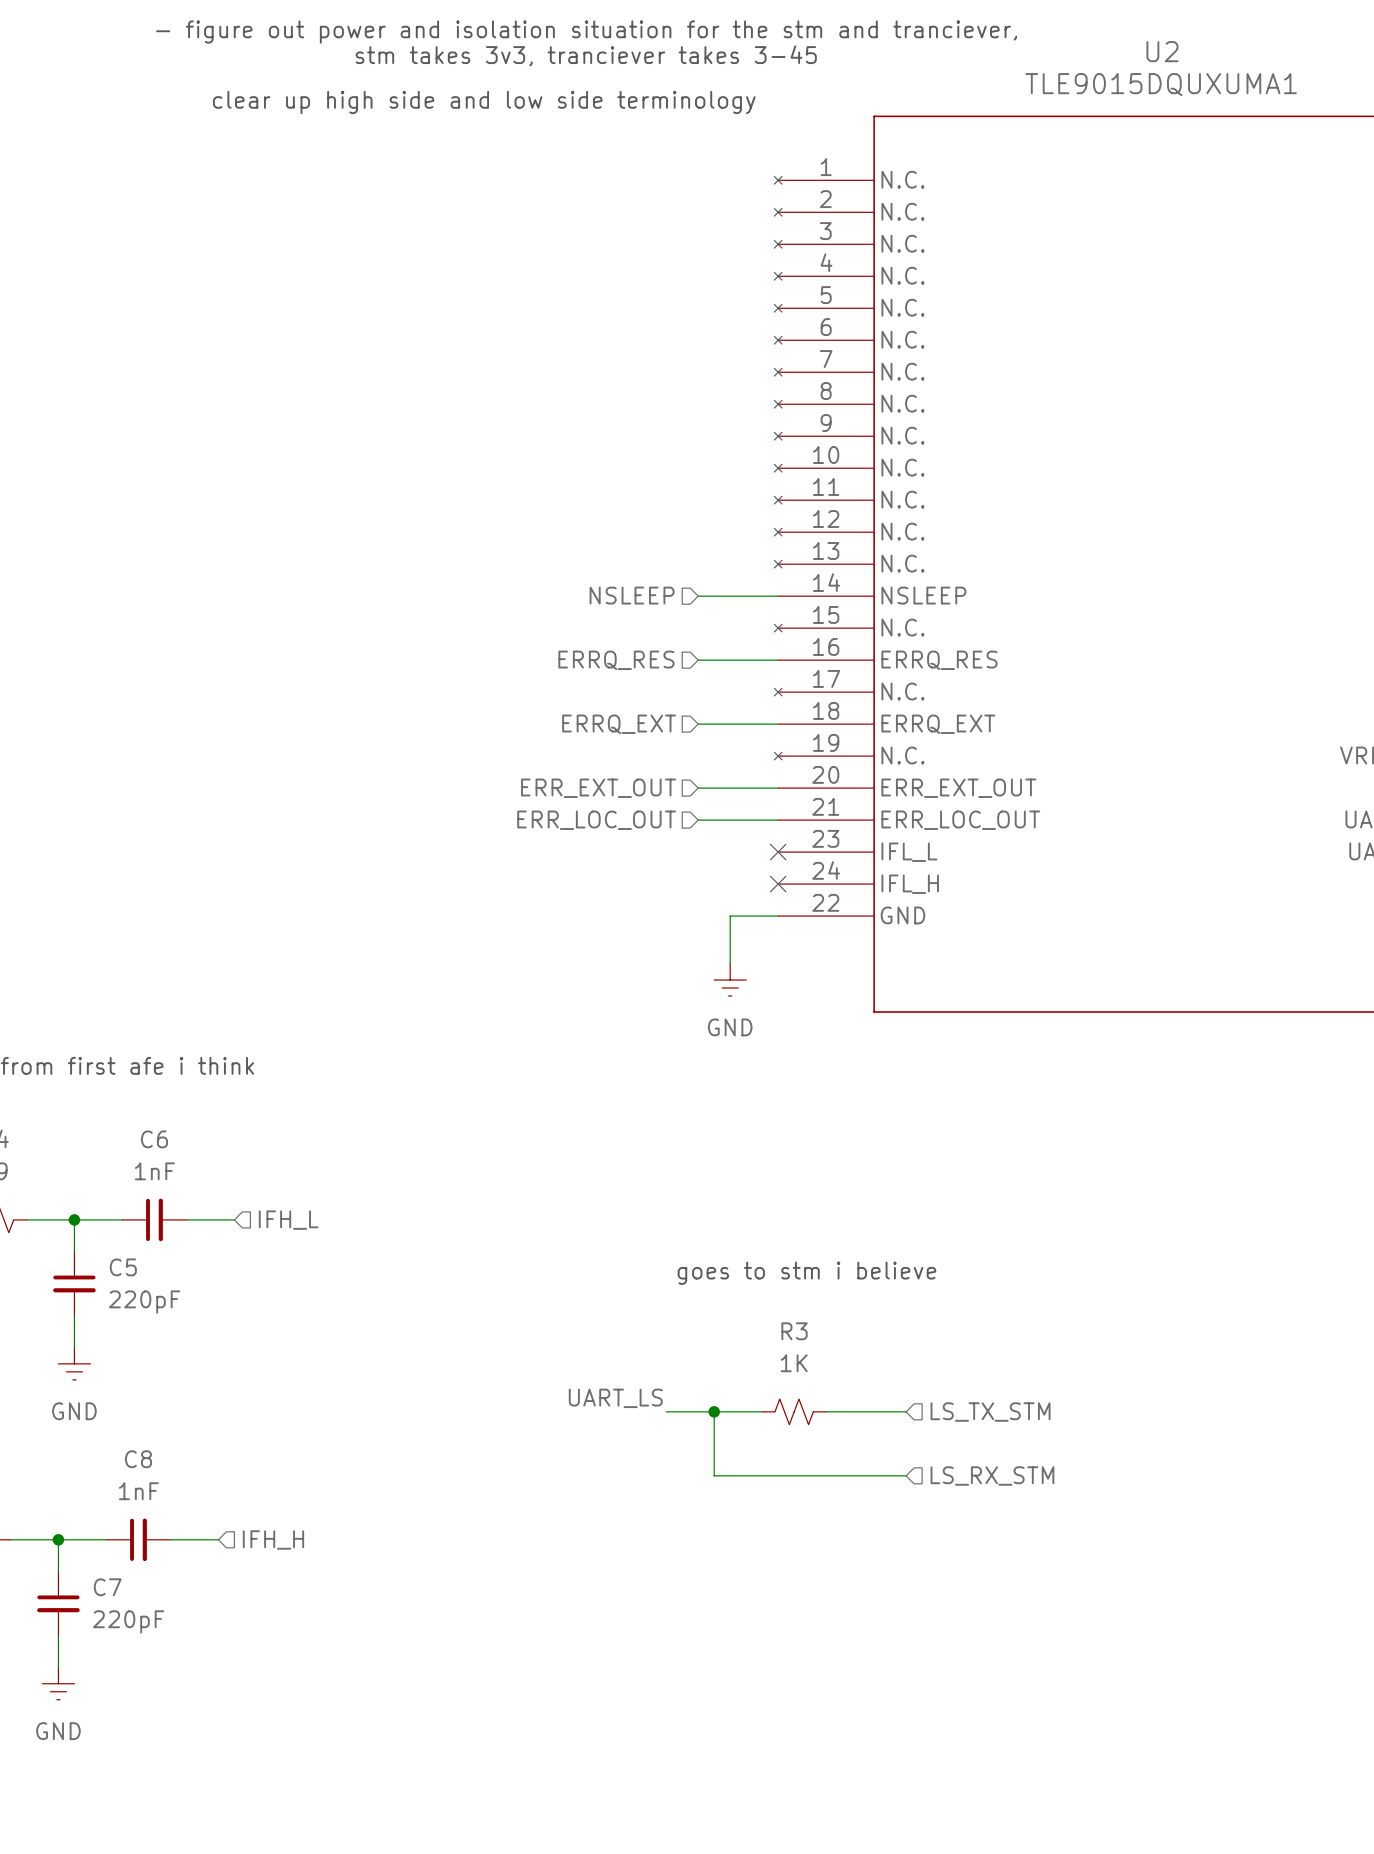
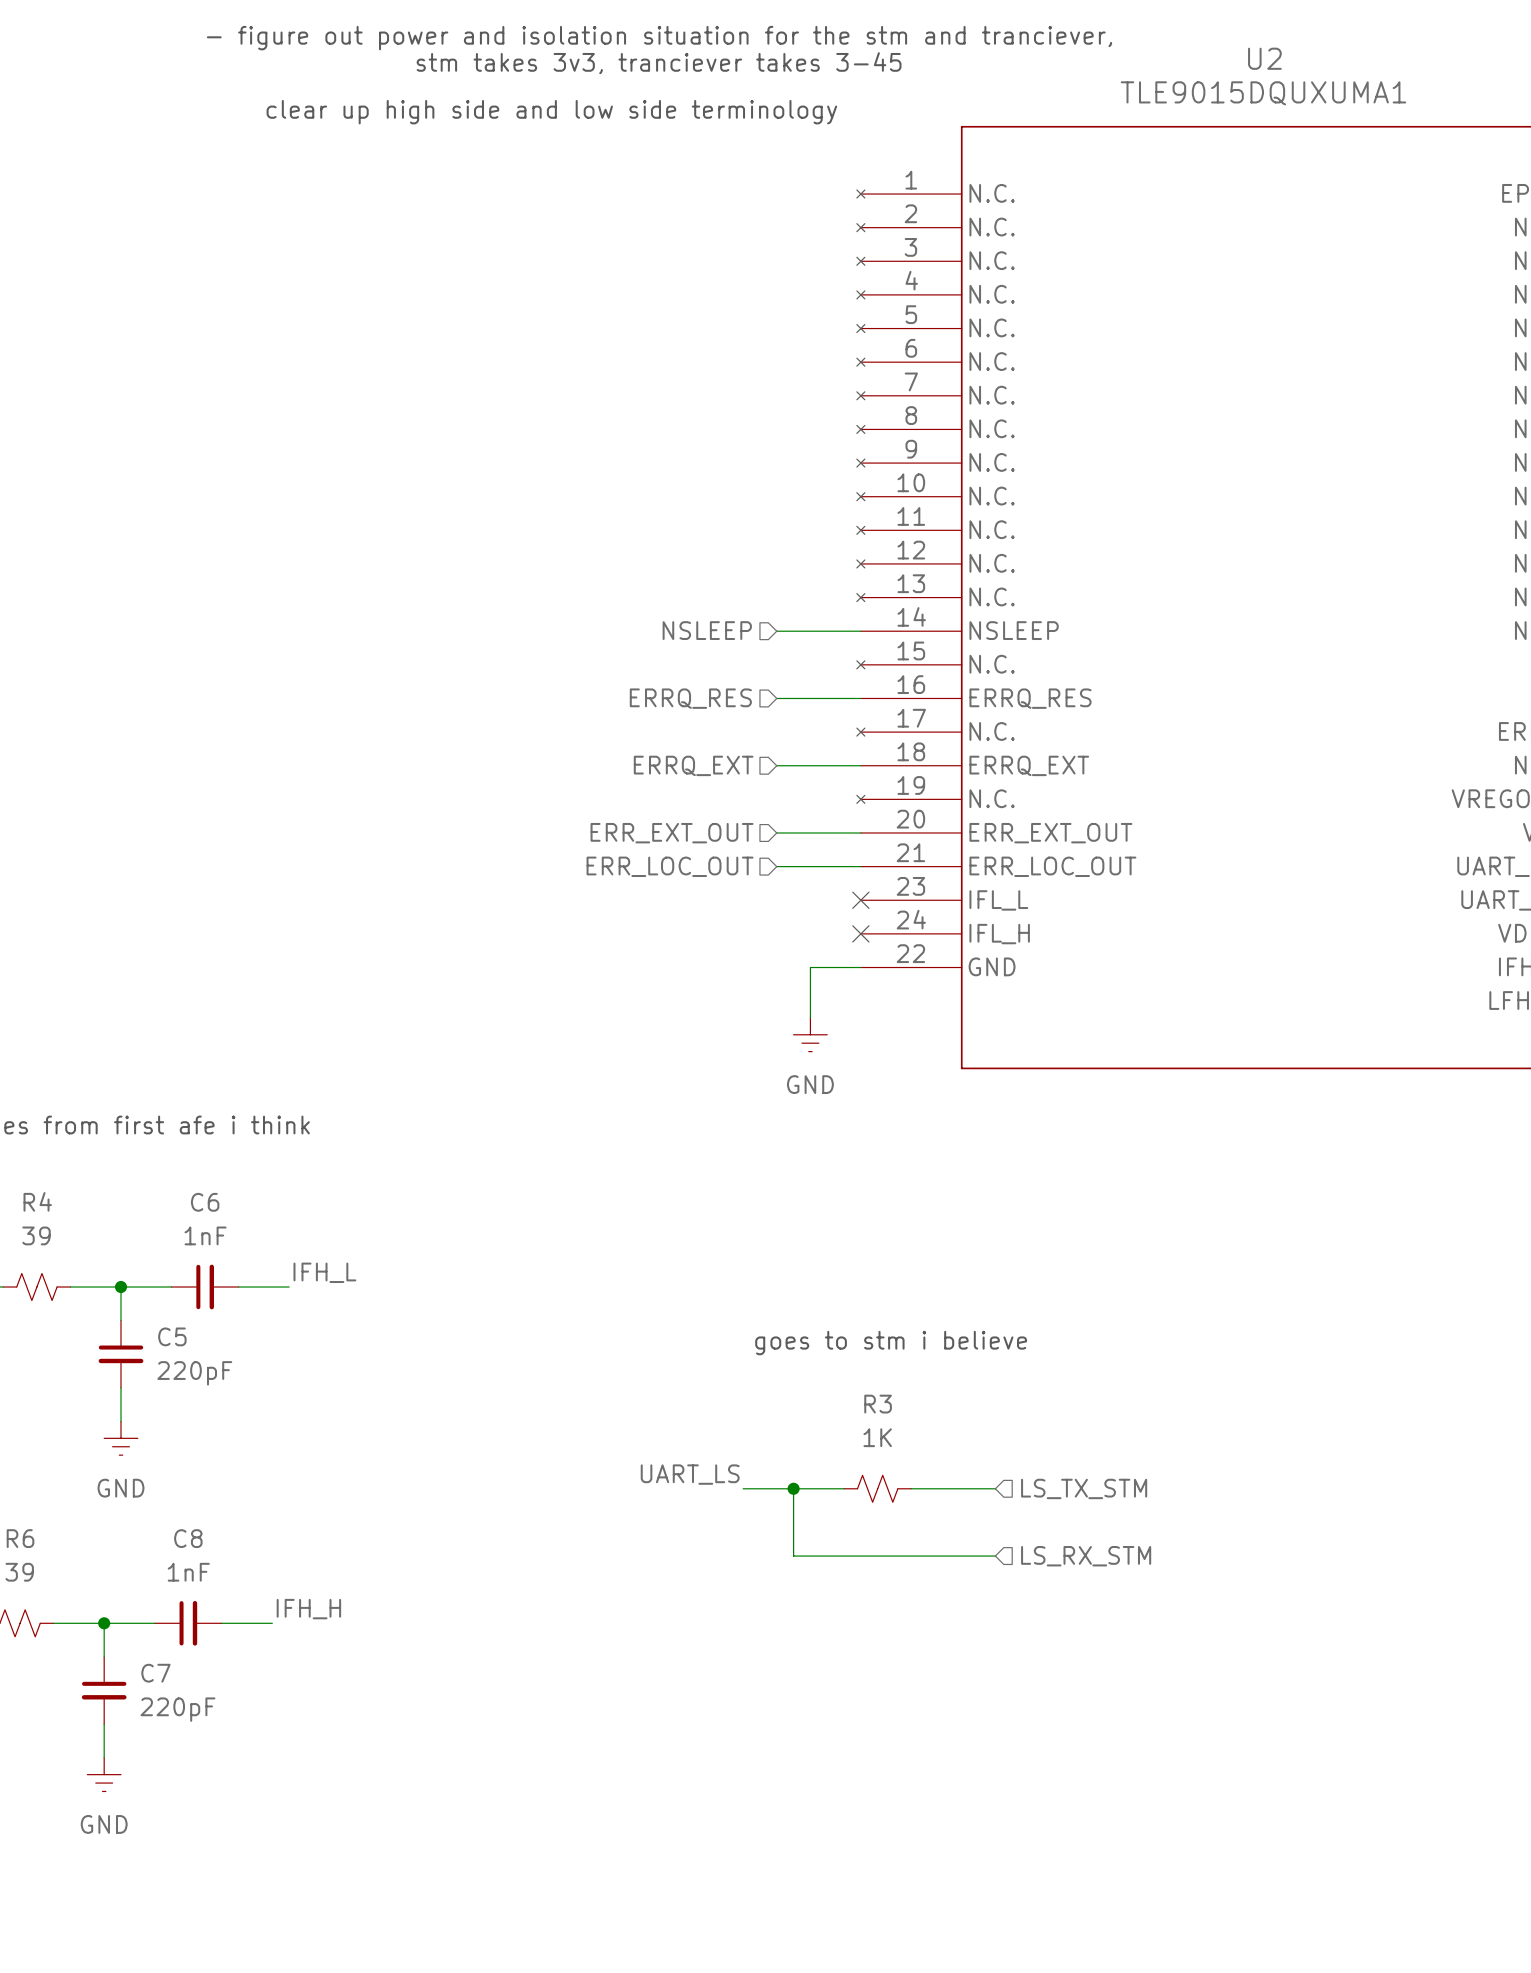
label: none -> IFH_L (324, 1272)
hierarchical label: IFH_L (288, 1220) -> none
label: none -> IFH_H (308, 1609)
hierarchical label: IFH_H (273, 1539) -> none

